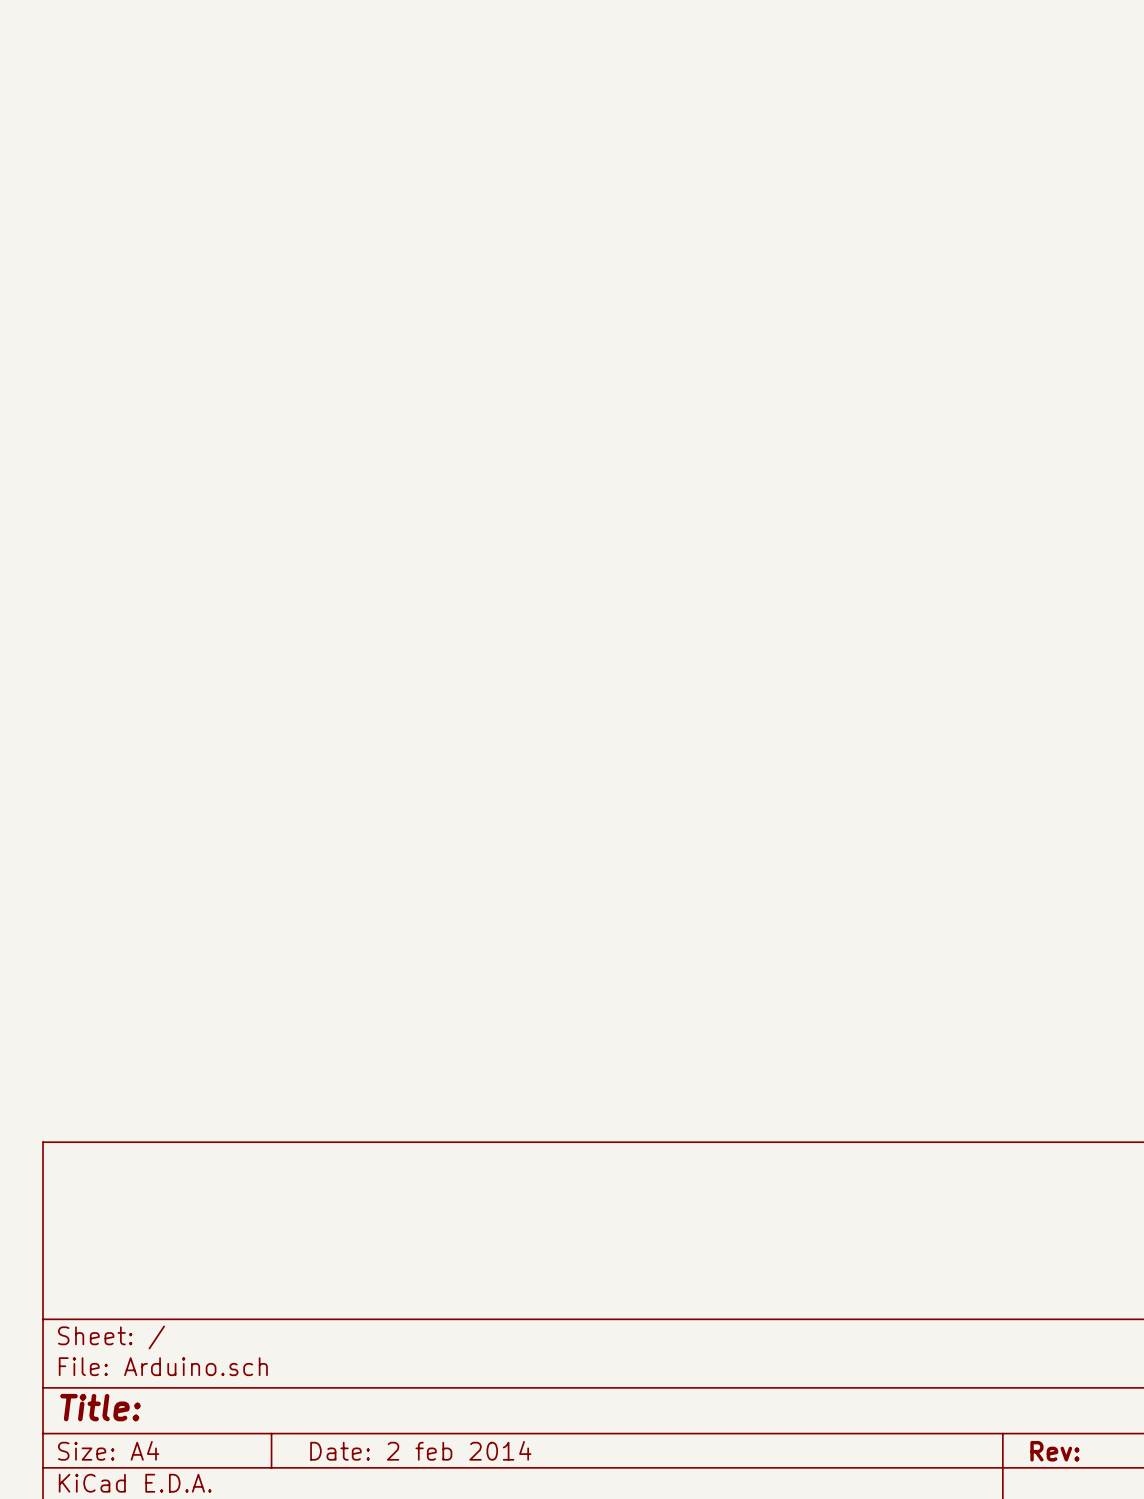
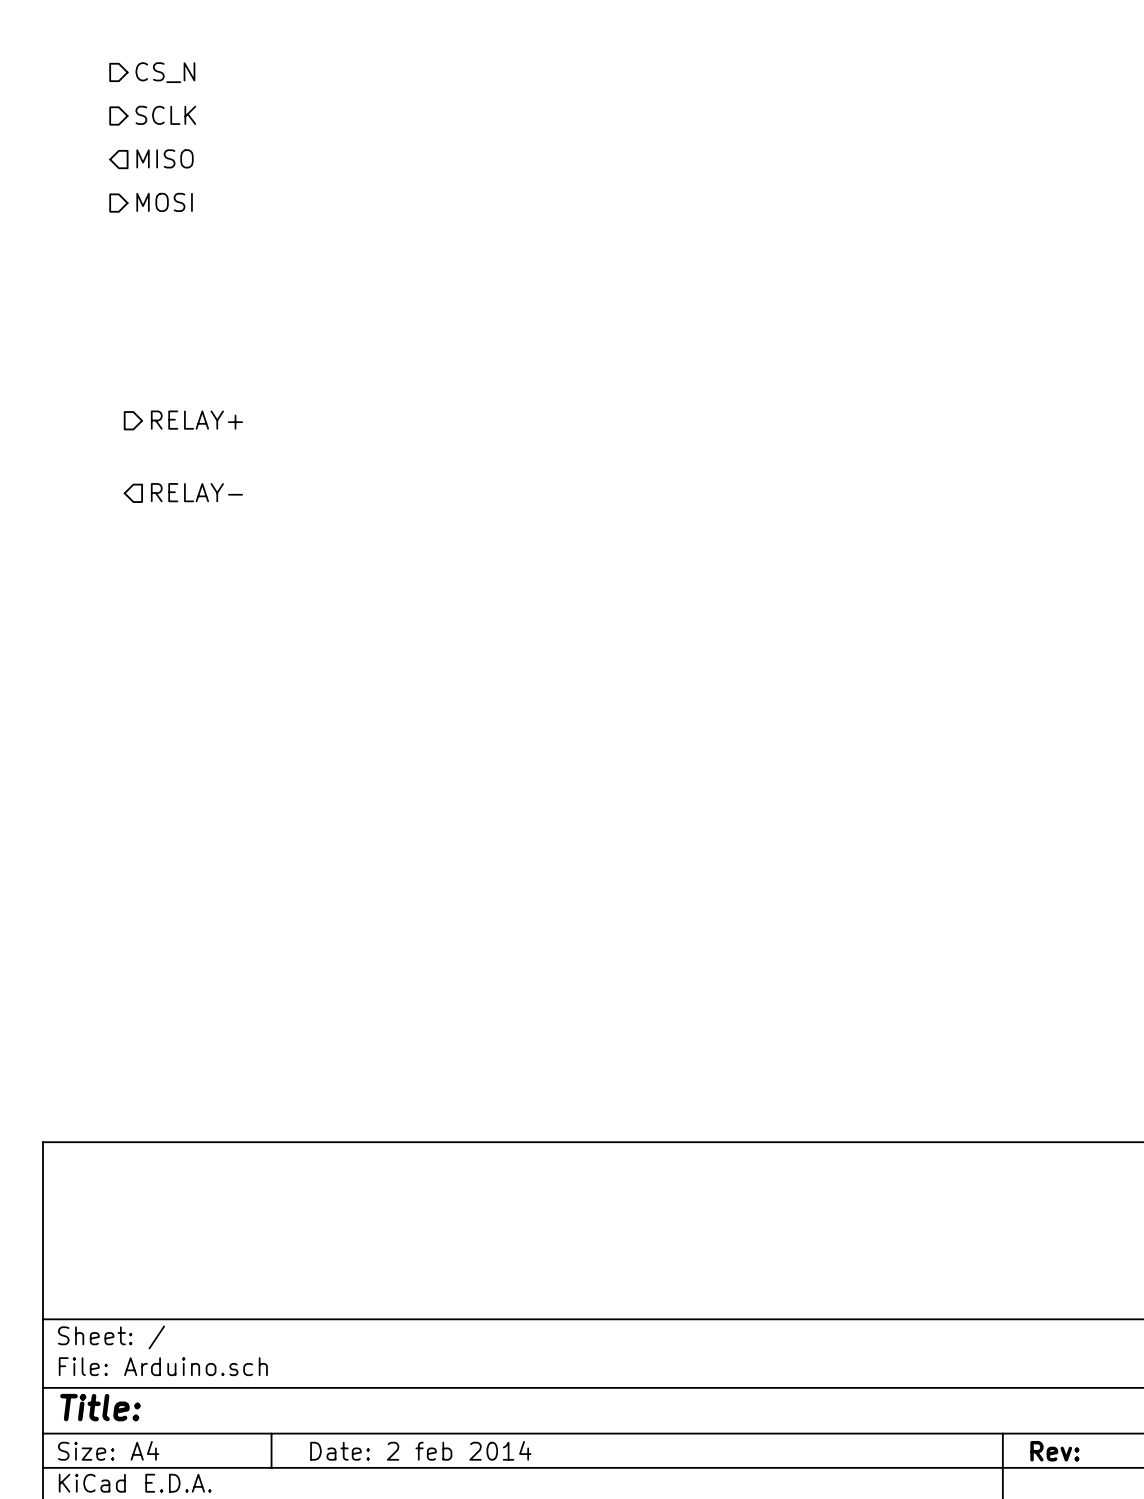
hierarchical label: none -> CS_N (165, 72)
hierarchical label: none -> SCLK (165, 115)
hierarchical label: none -> MISO (165, 158)
hierarchical label: none -> MOSI (164, 202)
hierarchical label: none -> RELAY+ (196, 420)
hierarchical label: none -> RELAY- (196, 492)

